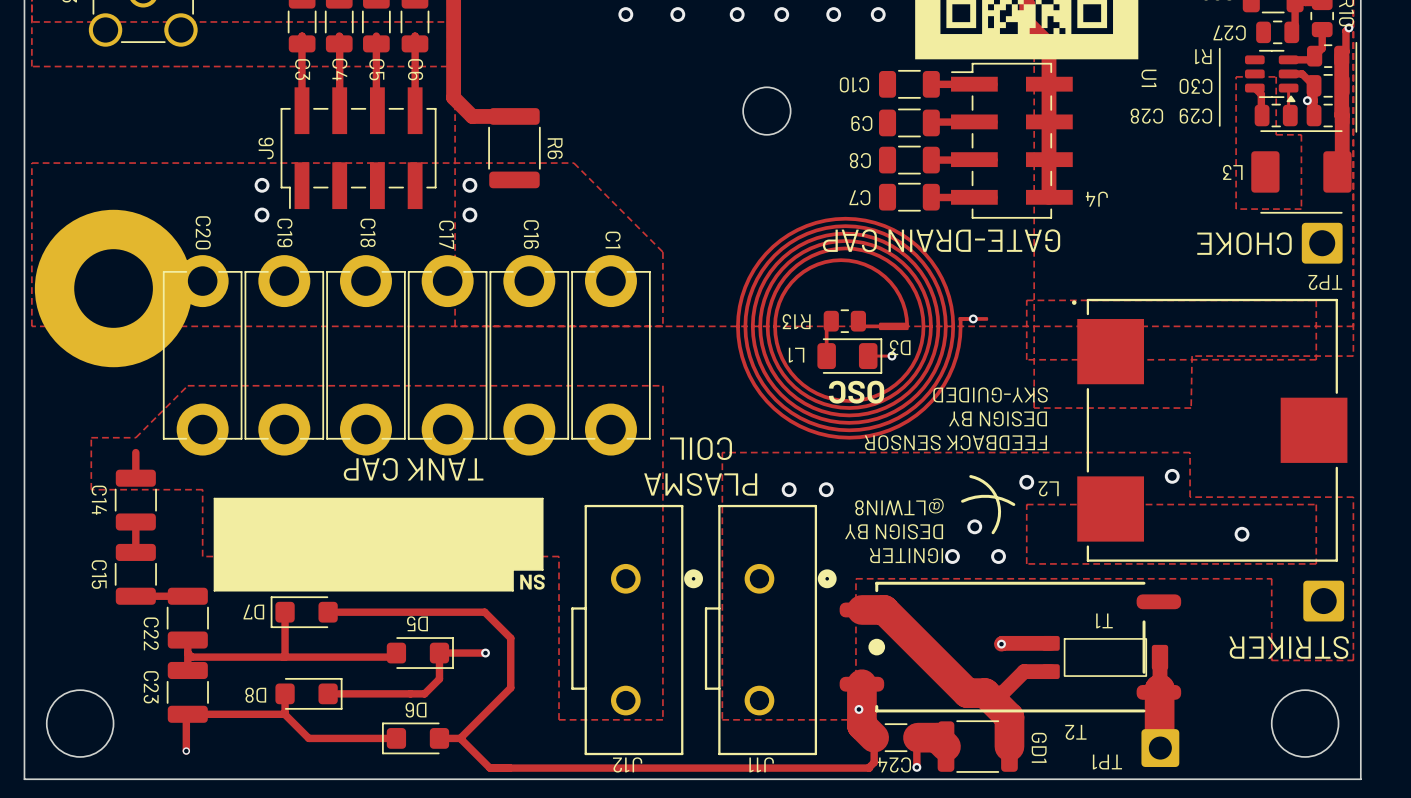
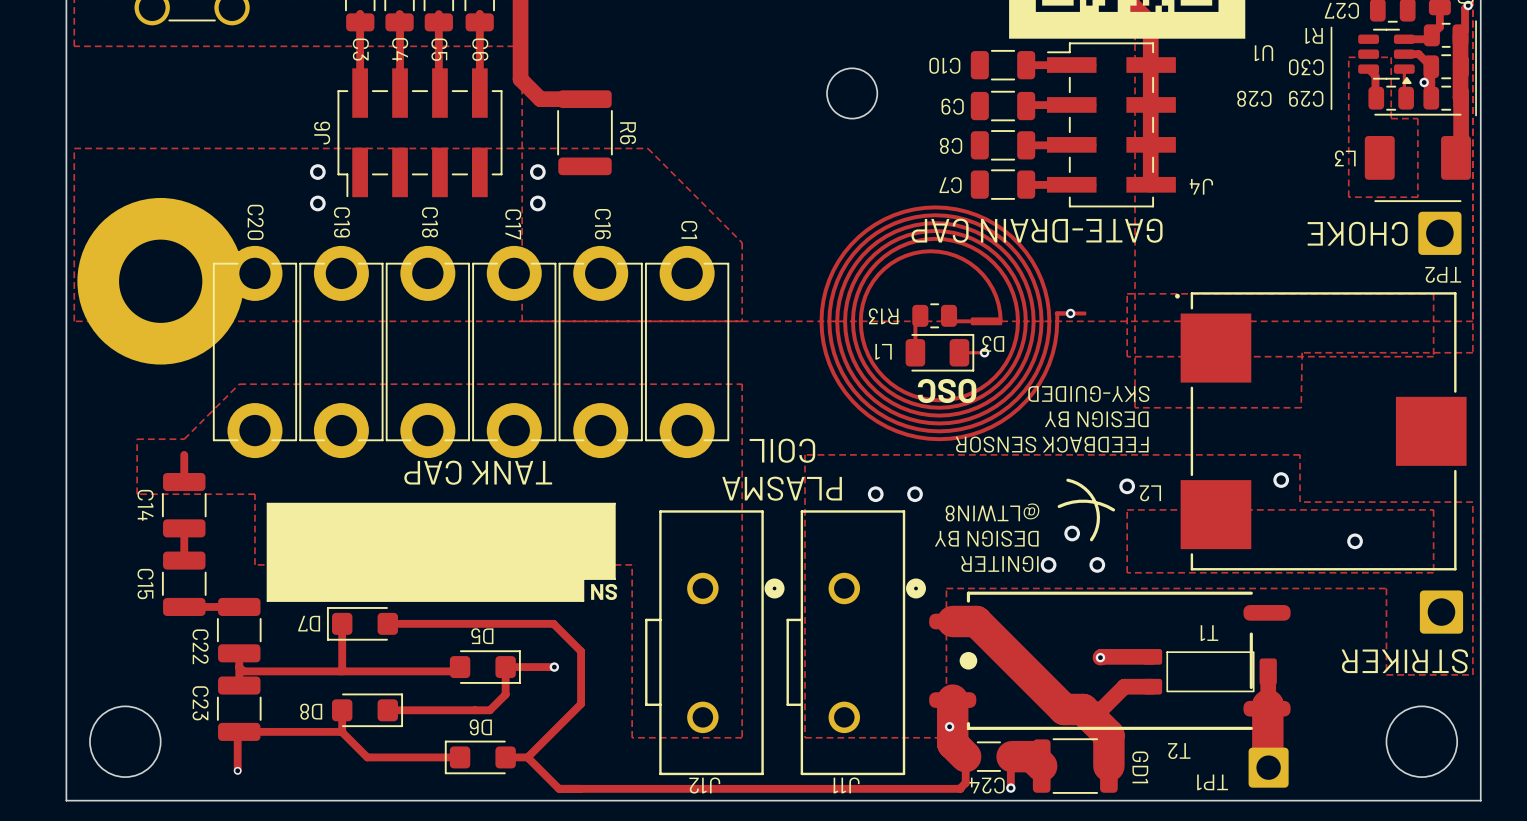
U1 name rotation: 0° (1148, 78) -> 90° clockwise (1263, 53)

